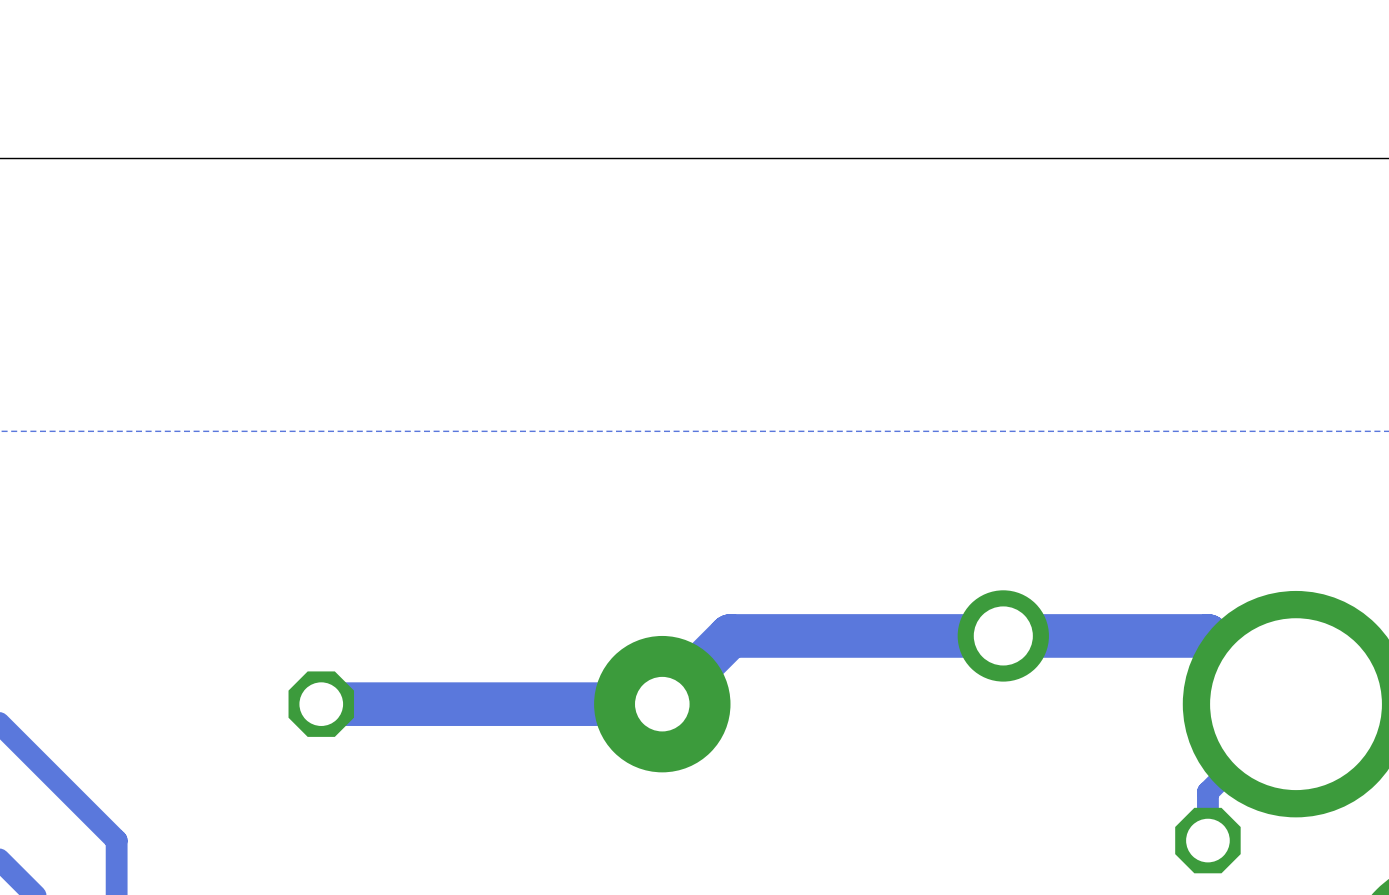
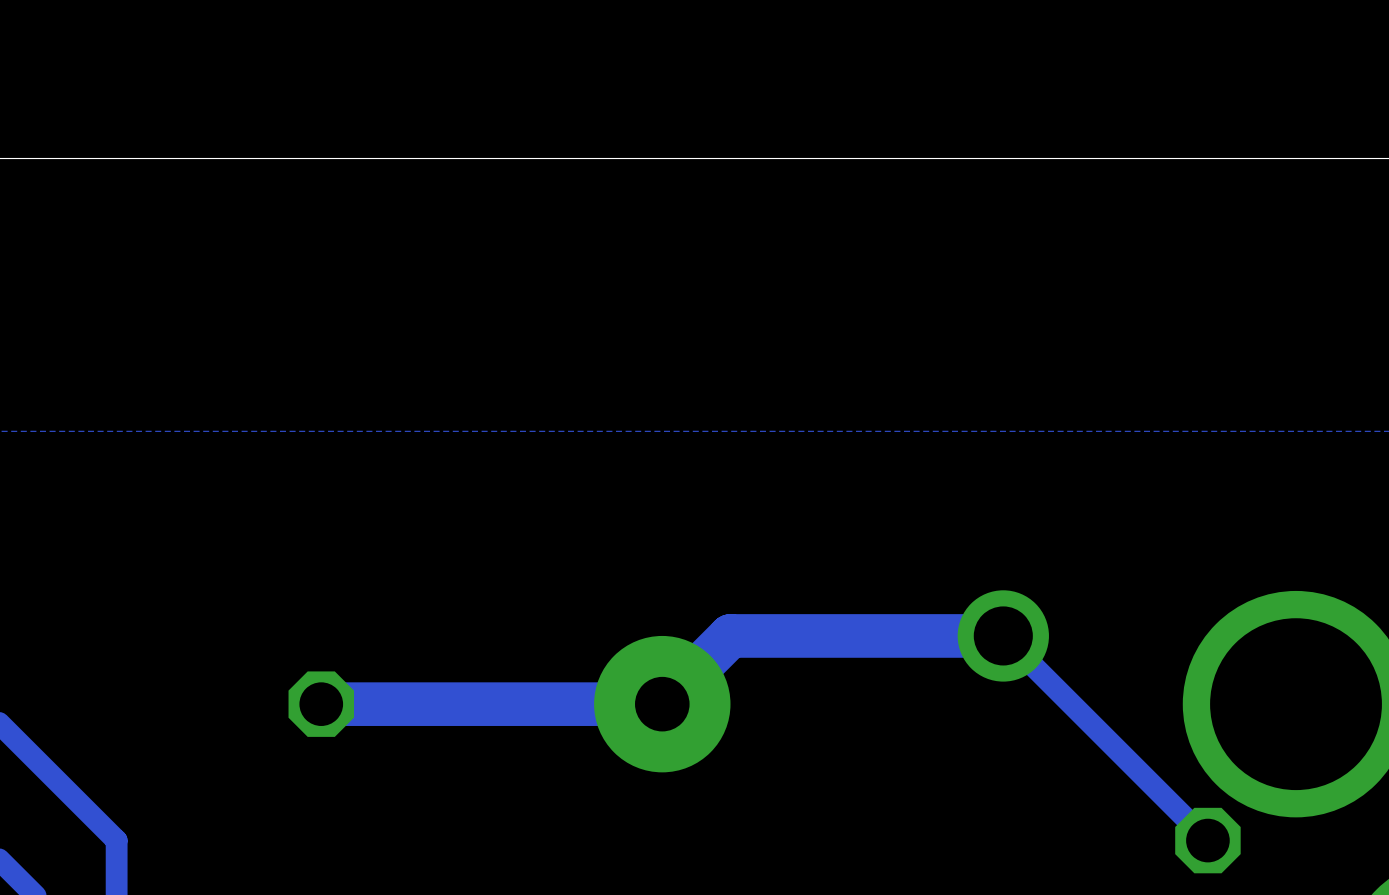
track: (1003, 635) (1207, 635) (1276, 704) (1296, 704) (1207, 792) (1207, 840) -> (1003, 635) (1207, 840)

